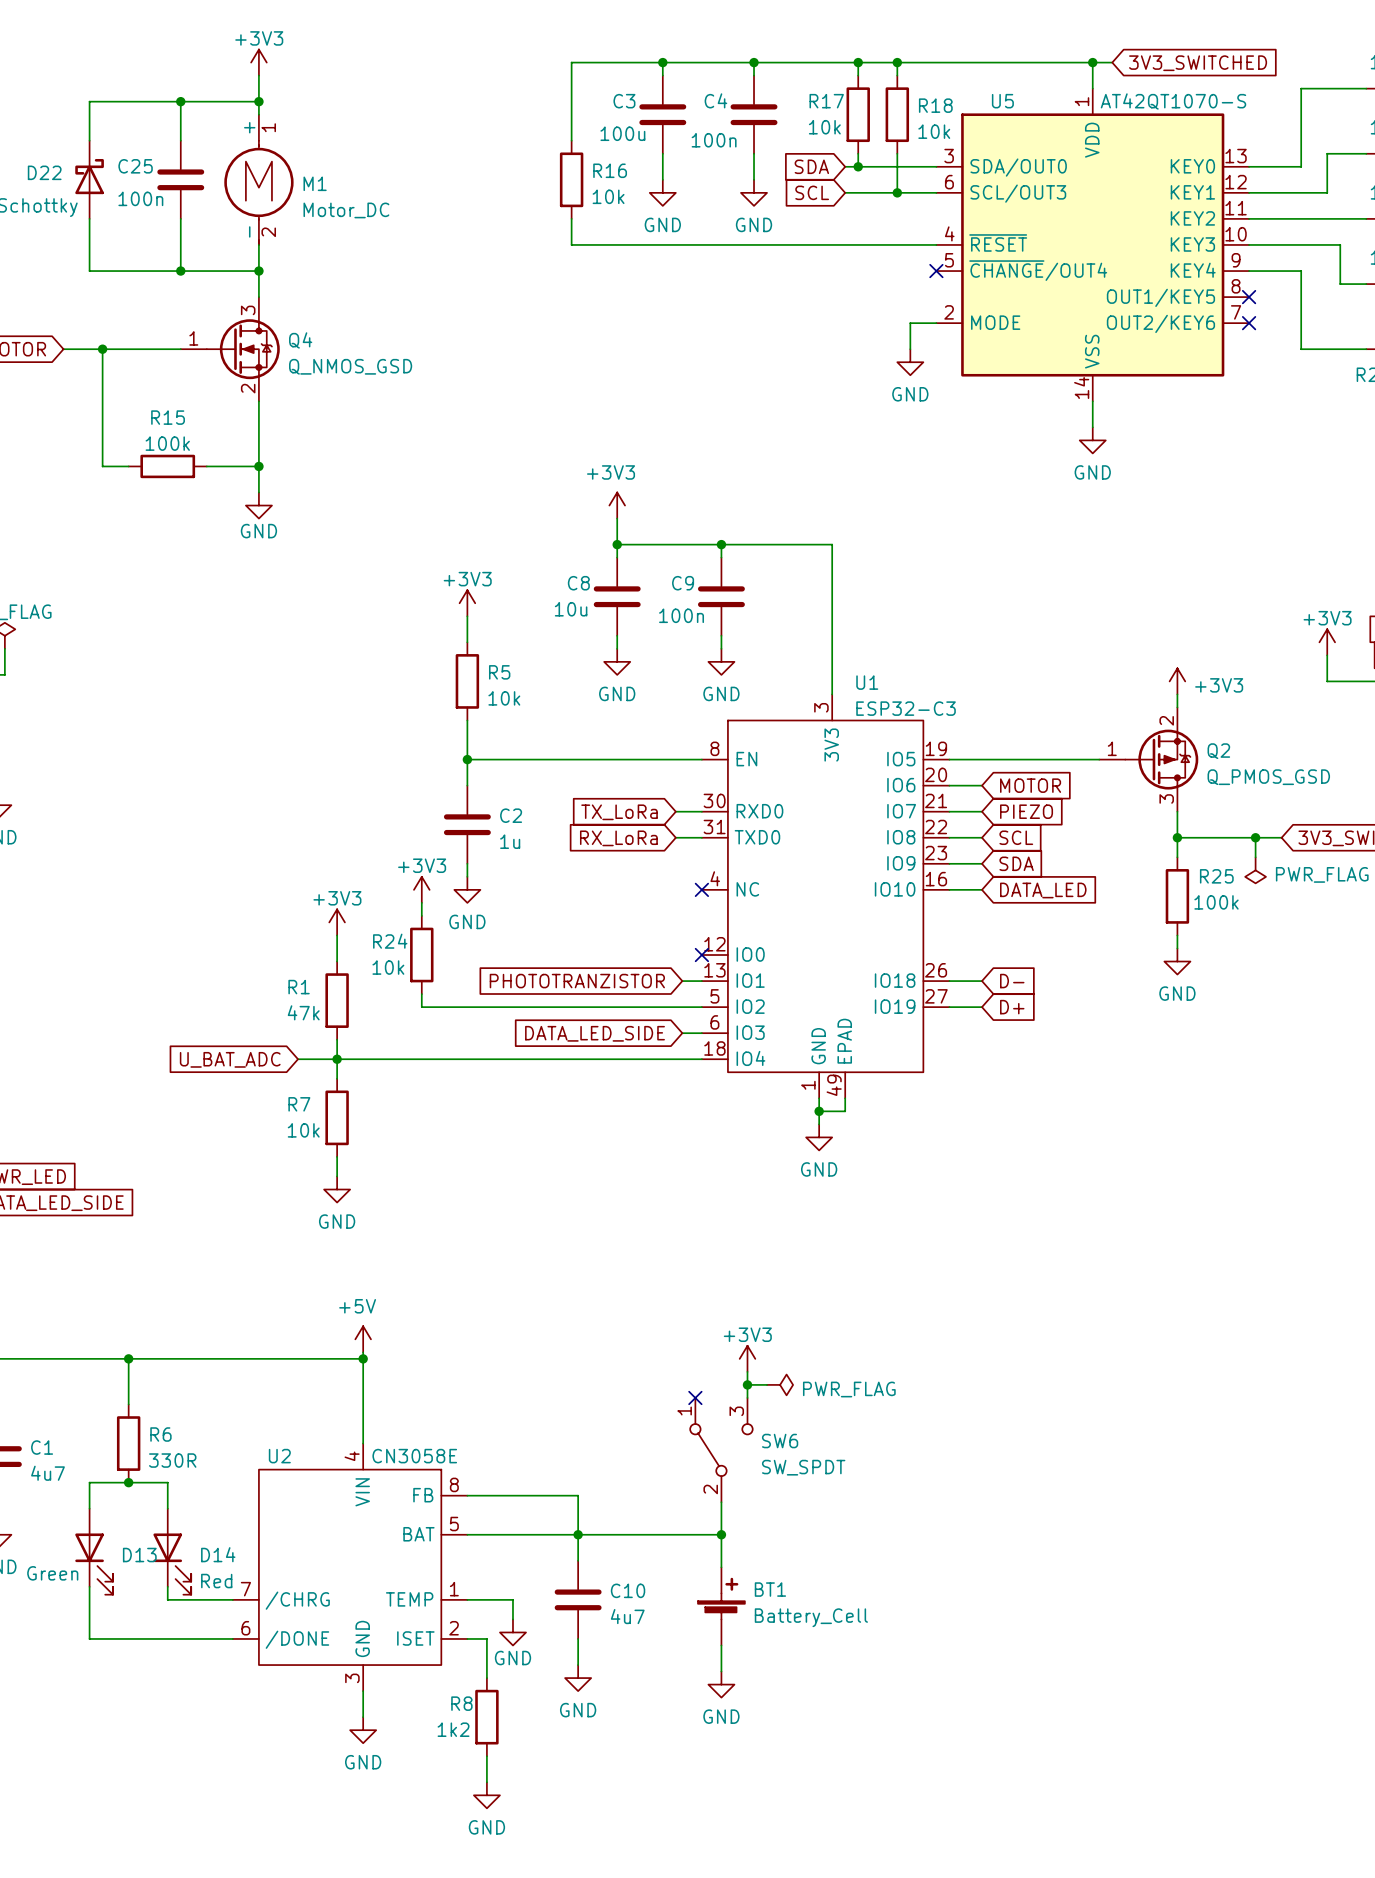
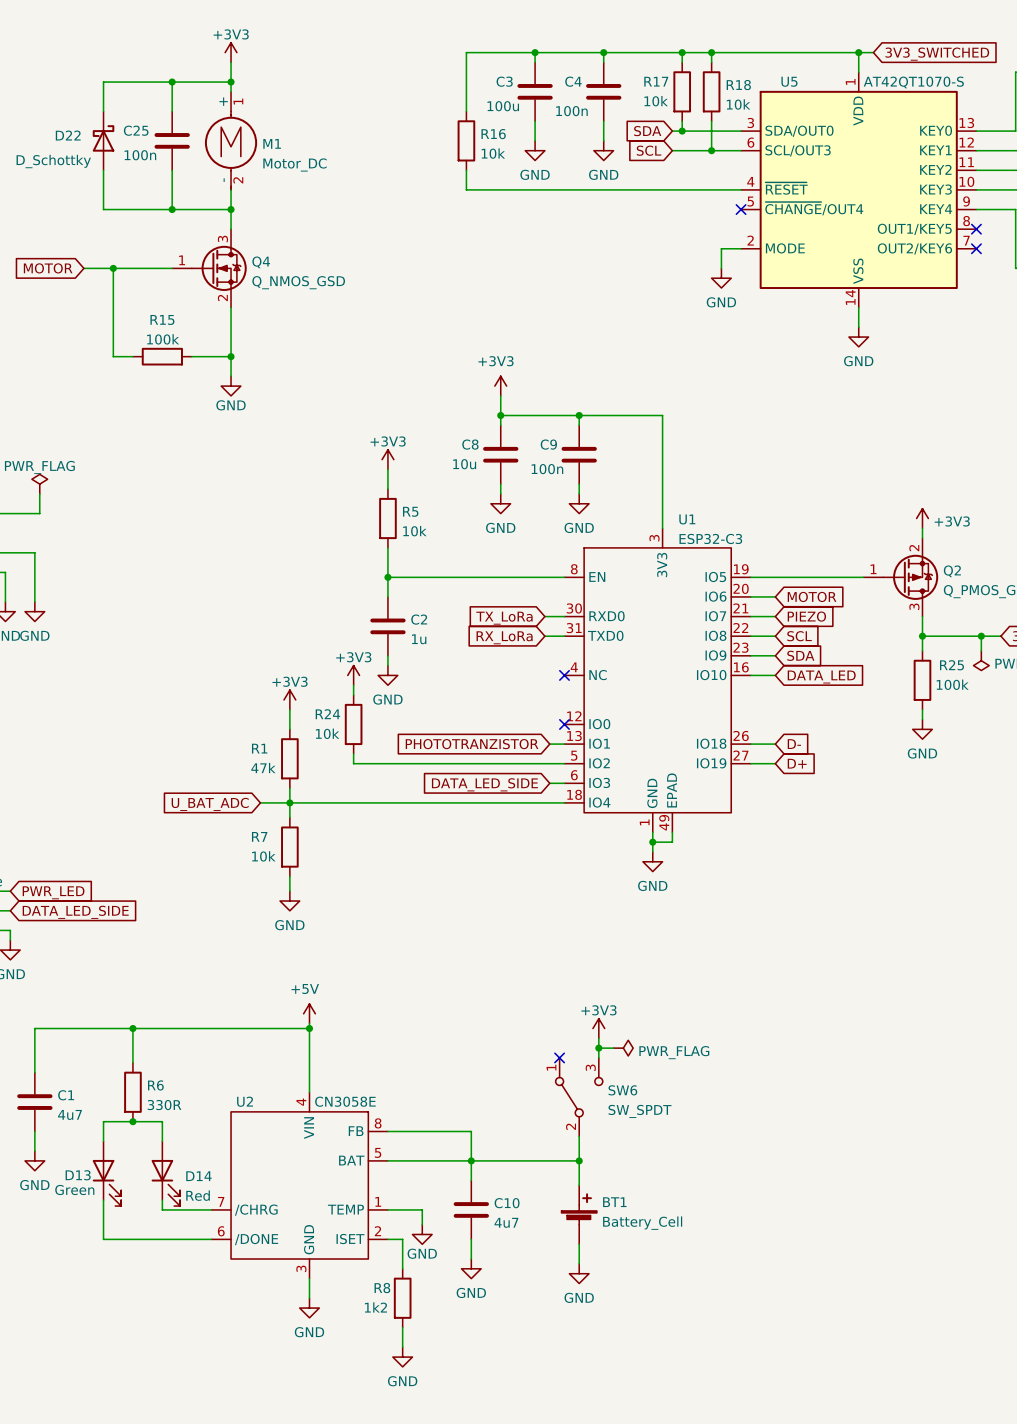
D13 name position: D13 (139, 1555) -> D13 (78, 1175)

